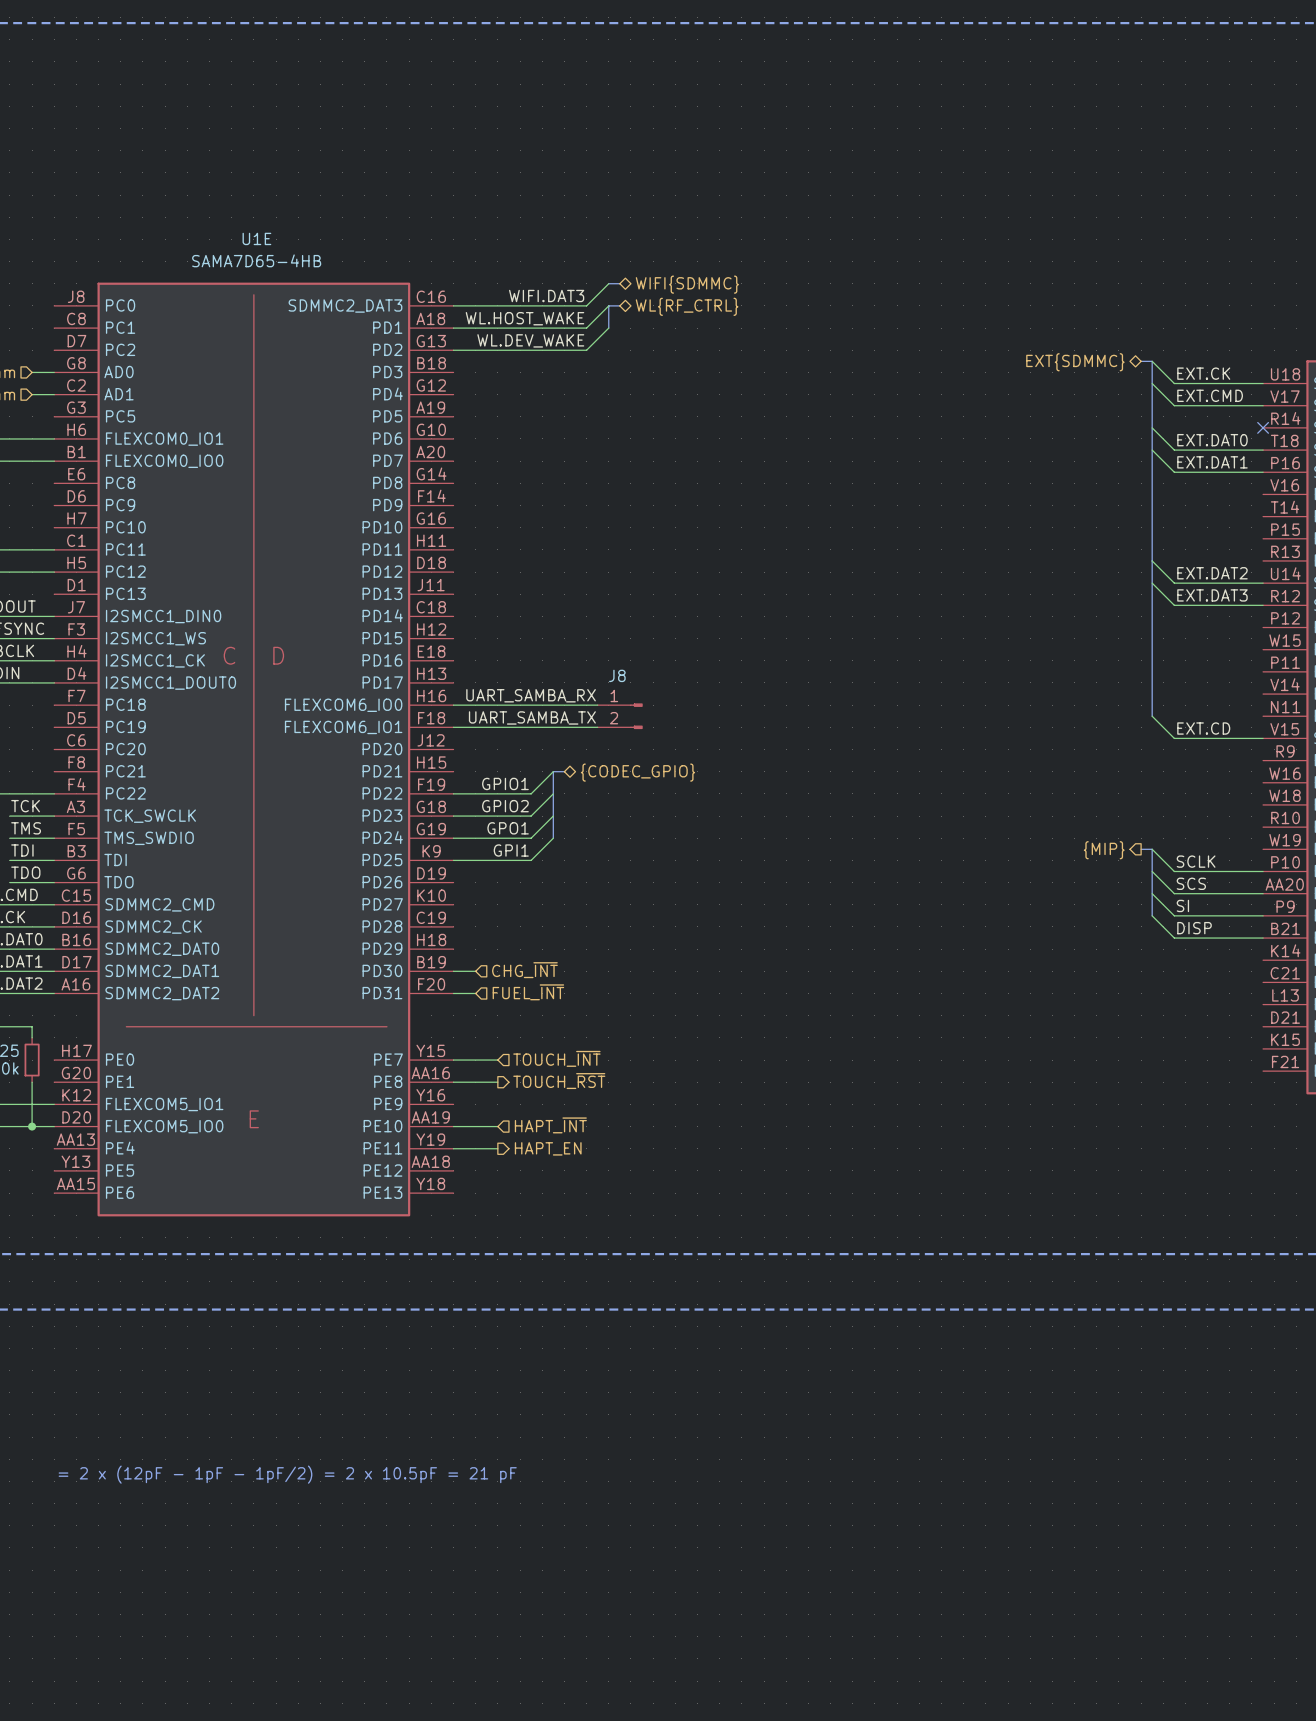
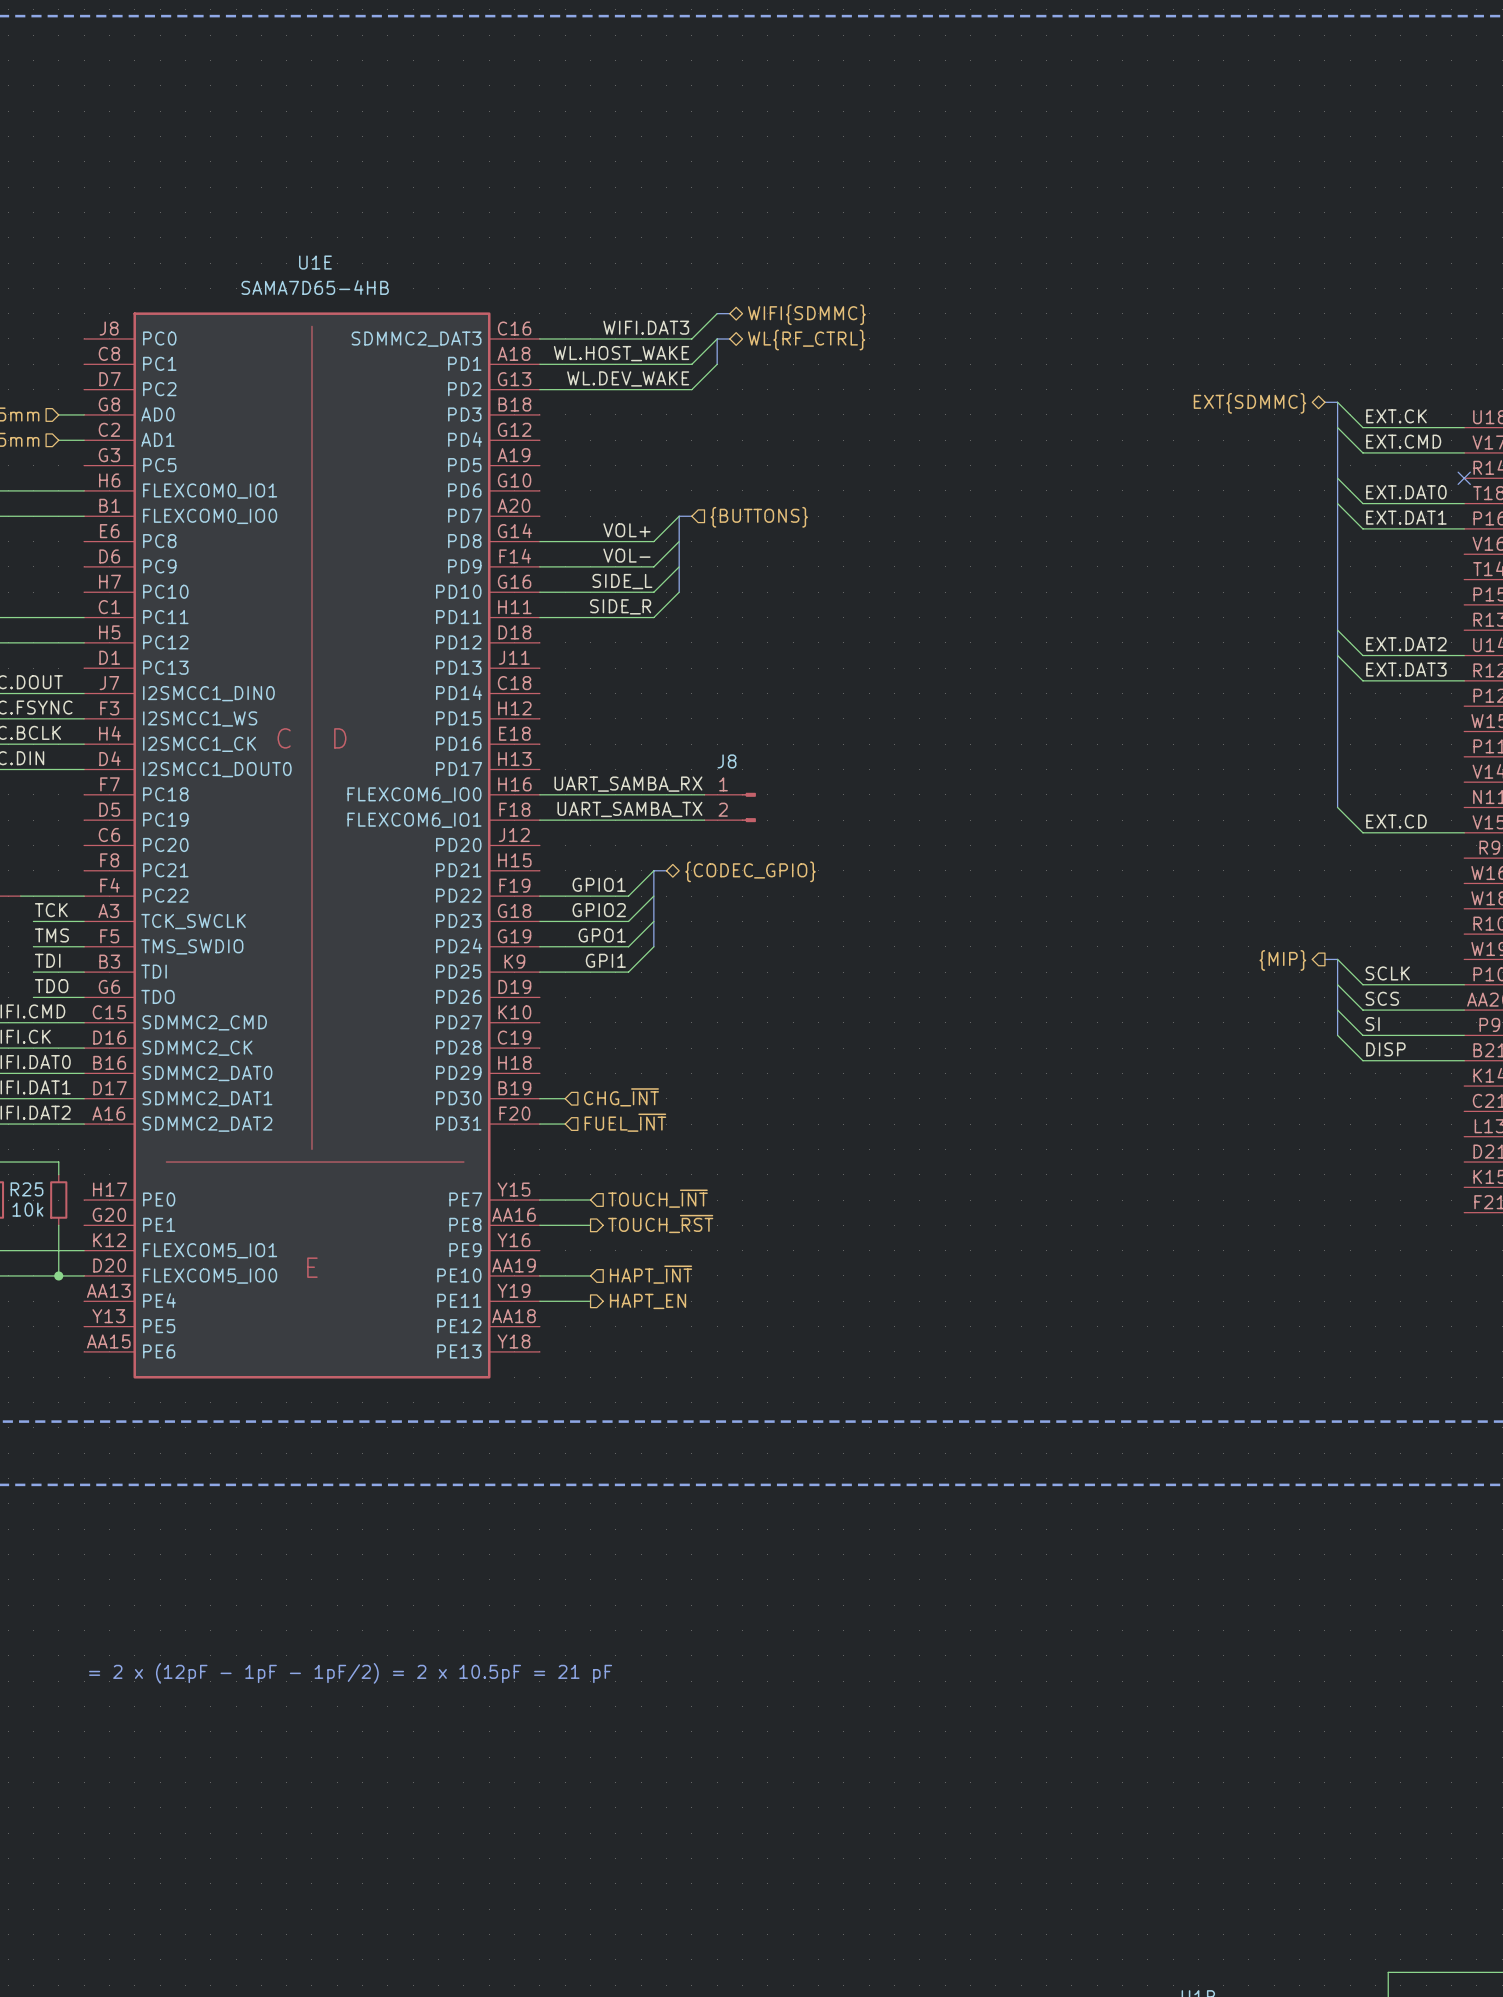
wire: none -> (679, 516) (653, 541) (539, 541)
bus: none -> (691, 516) (679, 516) (679, 592)
hierarchical label: none -> {BUTTONS} (759, 517)
label: none -> VOL+ (626, 530)
wire: none -> (679, 541) (653, 566) (539, 566)
label: none -> VOL- (626, 555)
wire: none -> (679, 566) (653, 592) (539, 592)
label: none -> SIDE_L (622, 581)
wire: none -> (679, 592) (653, 617) (539, 617)
label: none -> SIDE_R (620, 606)

